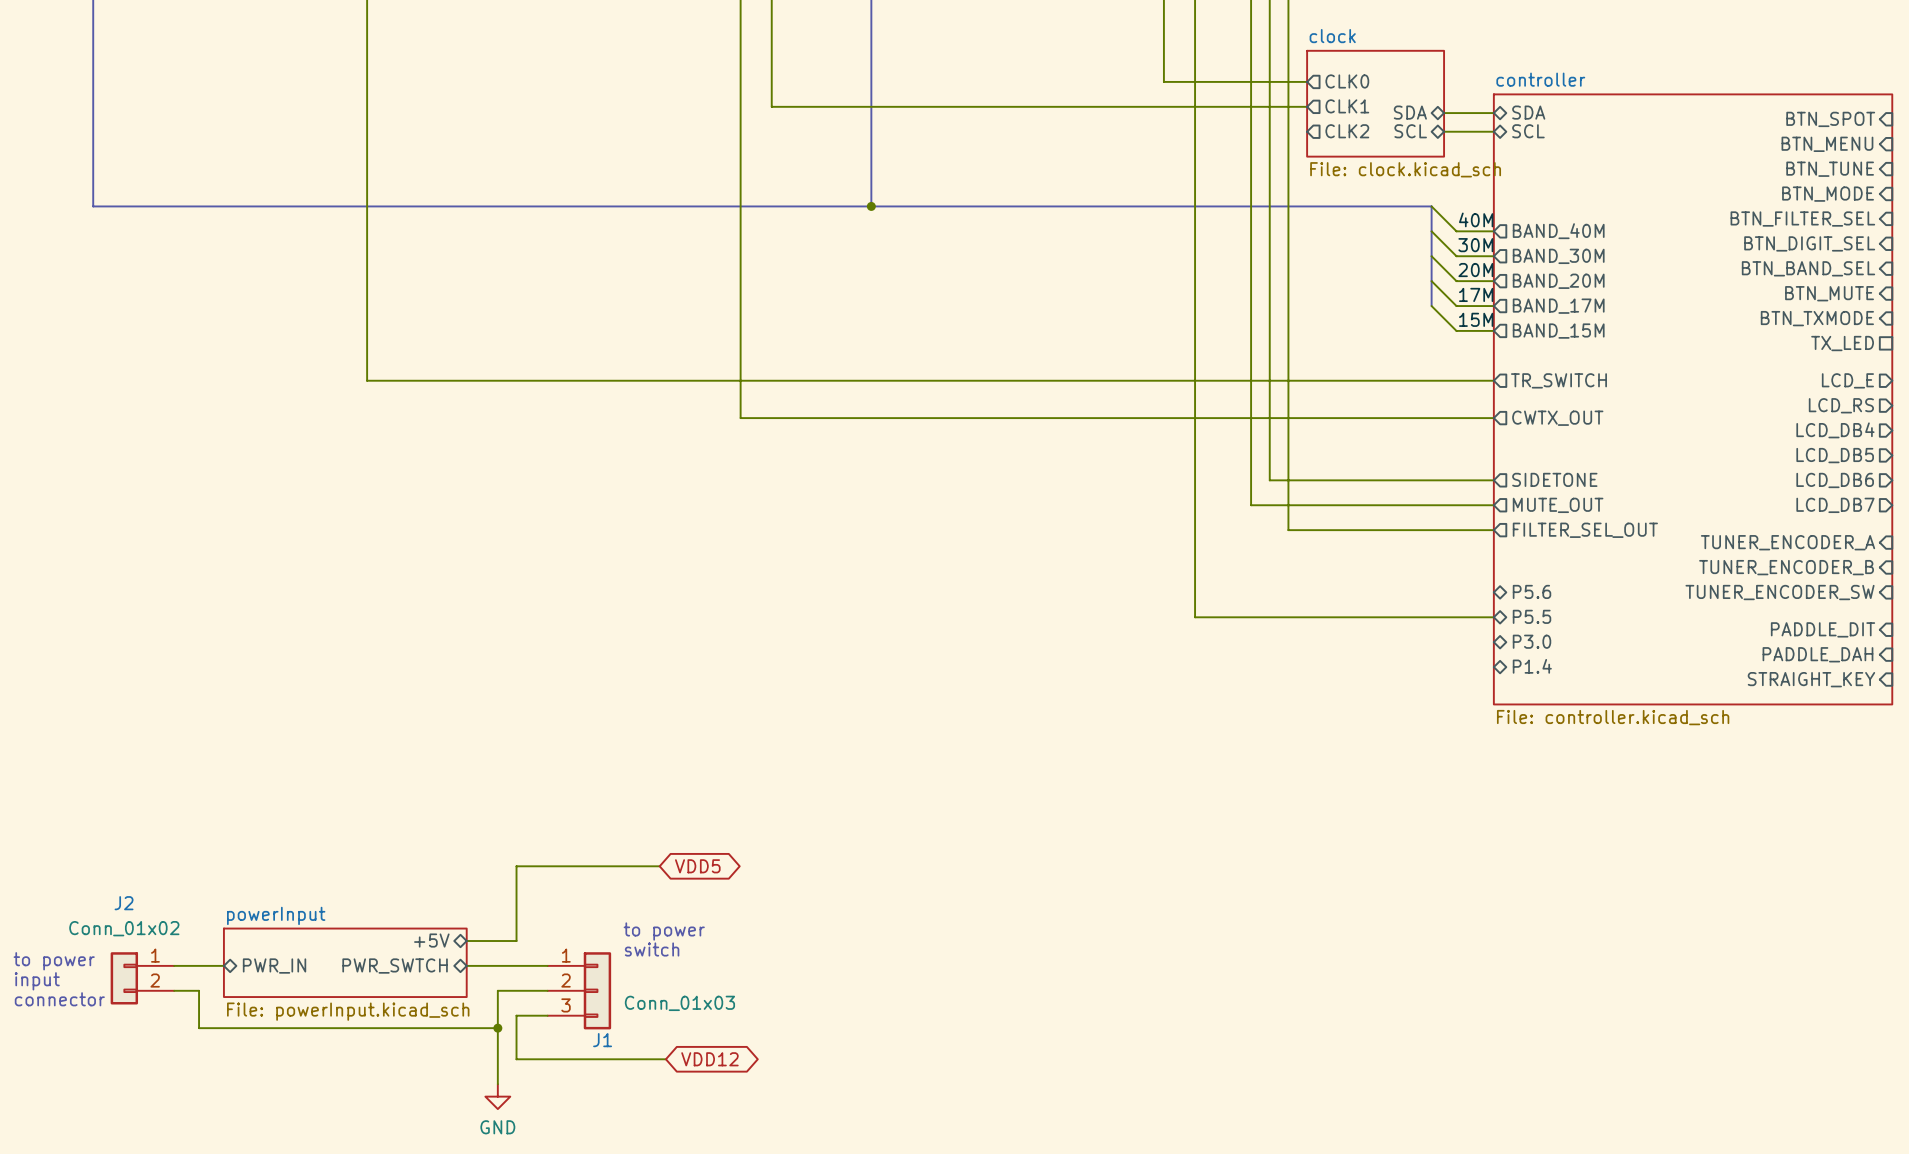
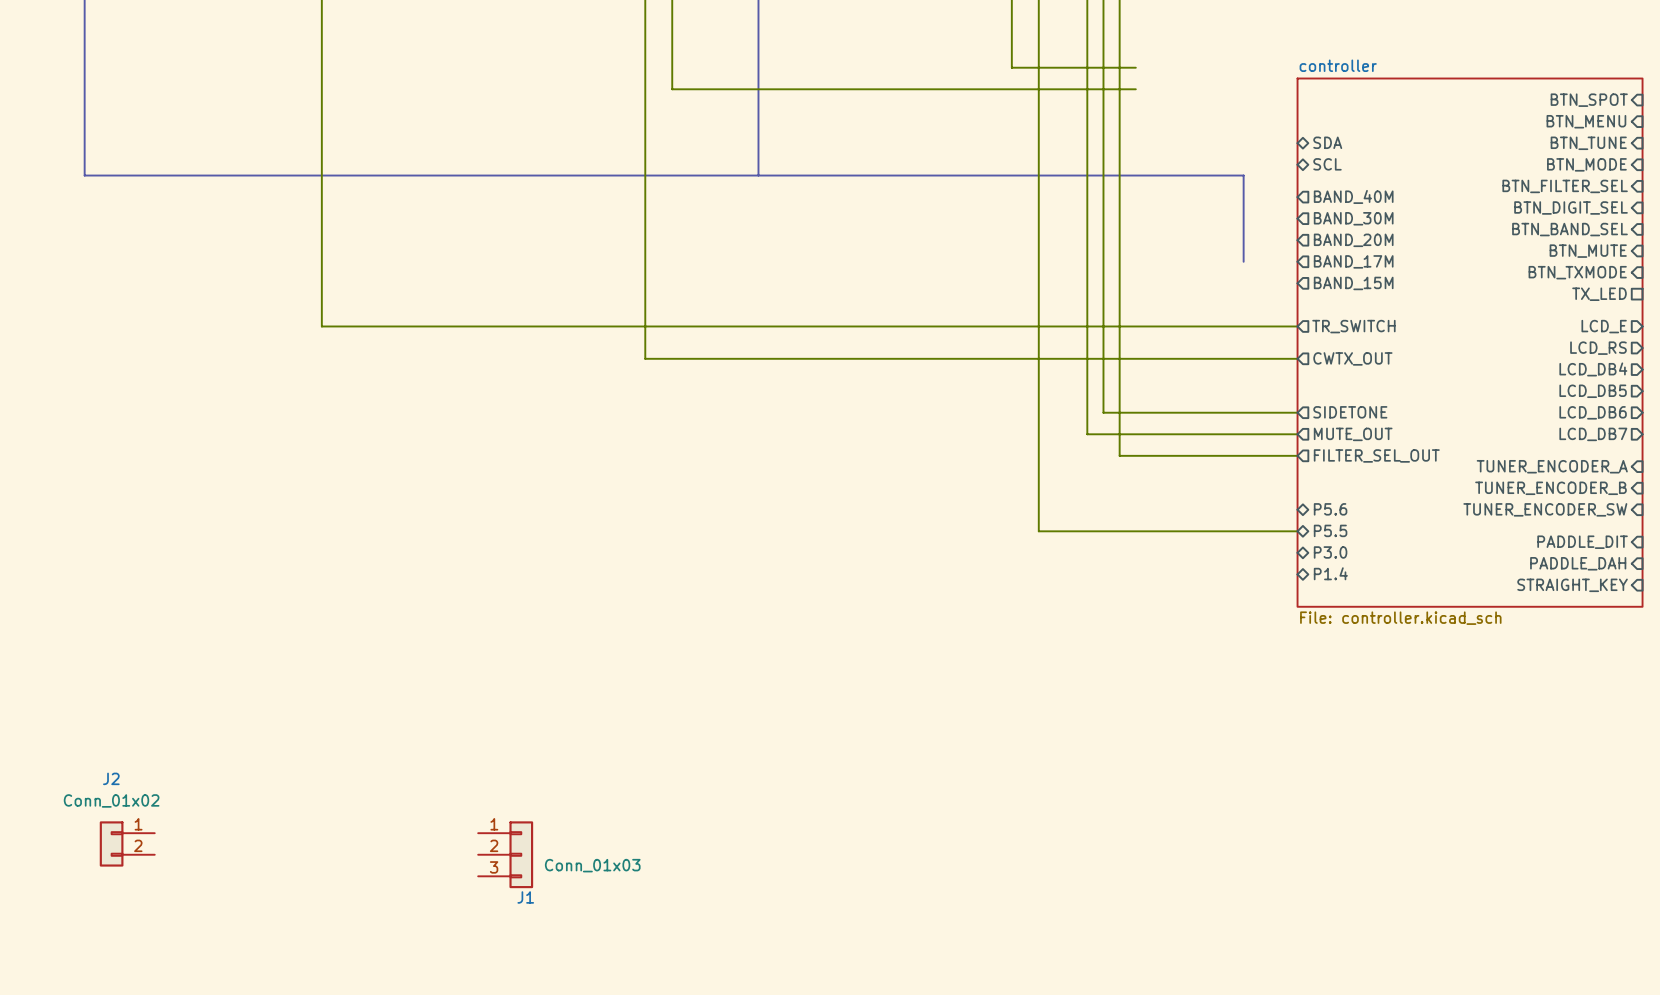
sheet pin: CLK0 (1347, 81) -> none
sheet clock: File: clock.kicad_sch (1375, 103) -> none
sheet pin: CLK1 (1347, 106) -> none
sheet pin: SDA (1410, 112) -> none
sheet pin: SDA (1528, 112) -> none
wire: (1444, 113) (1493, 113) -> none
sheet pin: CLK2 (1347, 131) -> none
sheet pin: SCL (1410, 131) -> none
wire: (1444, 131) (1493, 131) -> none
sheet pin: SCL (1528, 131) -> none
sheet pin: none -> SDA (1327, 142)
sheet pin: none -> SCL (1327, 164)
junction: (871, 206) -> none
wire: (1431, 206) (1456, 231) (1493, 231) -> none
label: 40M (1476, 219) -> none
wire: (1431, 231) (1456, 256) (1493, 256) -> none
label: 30M (1475, 245) -> none
wire: (1431, 256) (1456, 281) (1493, 281) -> none
label: 20M (1475, 270) -> none
wire: (1431, 281) (1456, 306) (1493, 306) -> none
label: 17M (1476, 294) -> none
wire: (1431, 306) (1456, 330) (1493, 330) -> none
label: 15M (1476, 319) -> none
wire: (659, 866) (516, 866) (516, 941) (466, 941) -> none
global label: VDD5 (697, 866) -> none
text: to power (664, 931) -> none
sheet pin: +5V (431, 940) -> none
text: switch (652, 949) -> none
text: to power (54, 961) -> none
sheet powerInput: File: powerInput.kicad_sch (345, 962) -> none
wire: (174, 965) (223, 965) -> none
wire: (466, 965) (547, 965) -> none
sheet pin: PWR_IN (274, 966) -> none
sheet pin: PWR_SWTCH (395, 966) -> none
text: input (37, 981) -> none
wire: (174, 990) (199, 990) (199, 1028) (497, 1028) -> none
wire: (547, 990) (497, 990) (497, 1084) -> none
text: connector (59, 999) -> none
wire: (547, 1015) (516, 1015) (516, 1059) (665, 1059) -> none
junction: (497, 1028) -> none
global label: VDD12 (709, 1059) -> none
power symbol: GND (497, 1096) -> none

